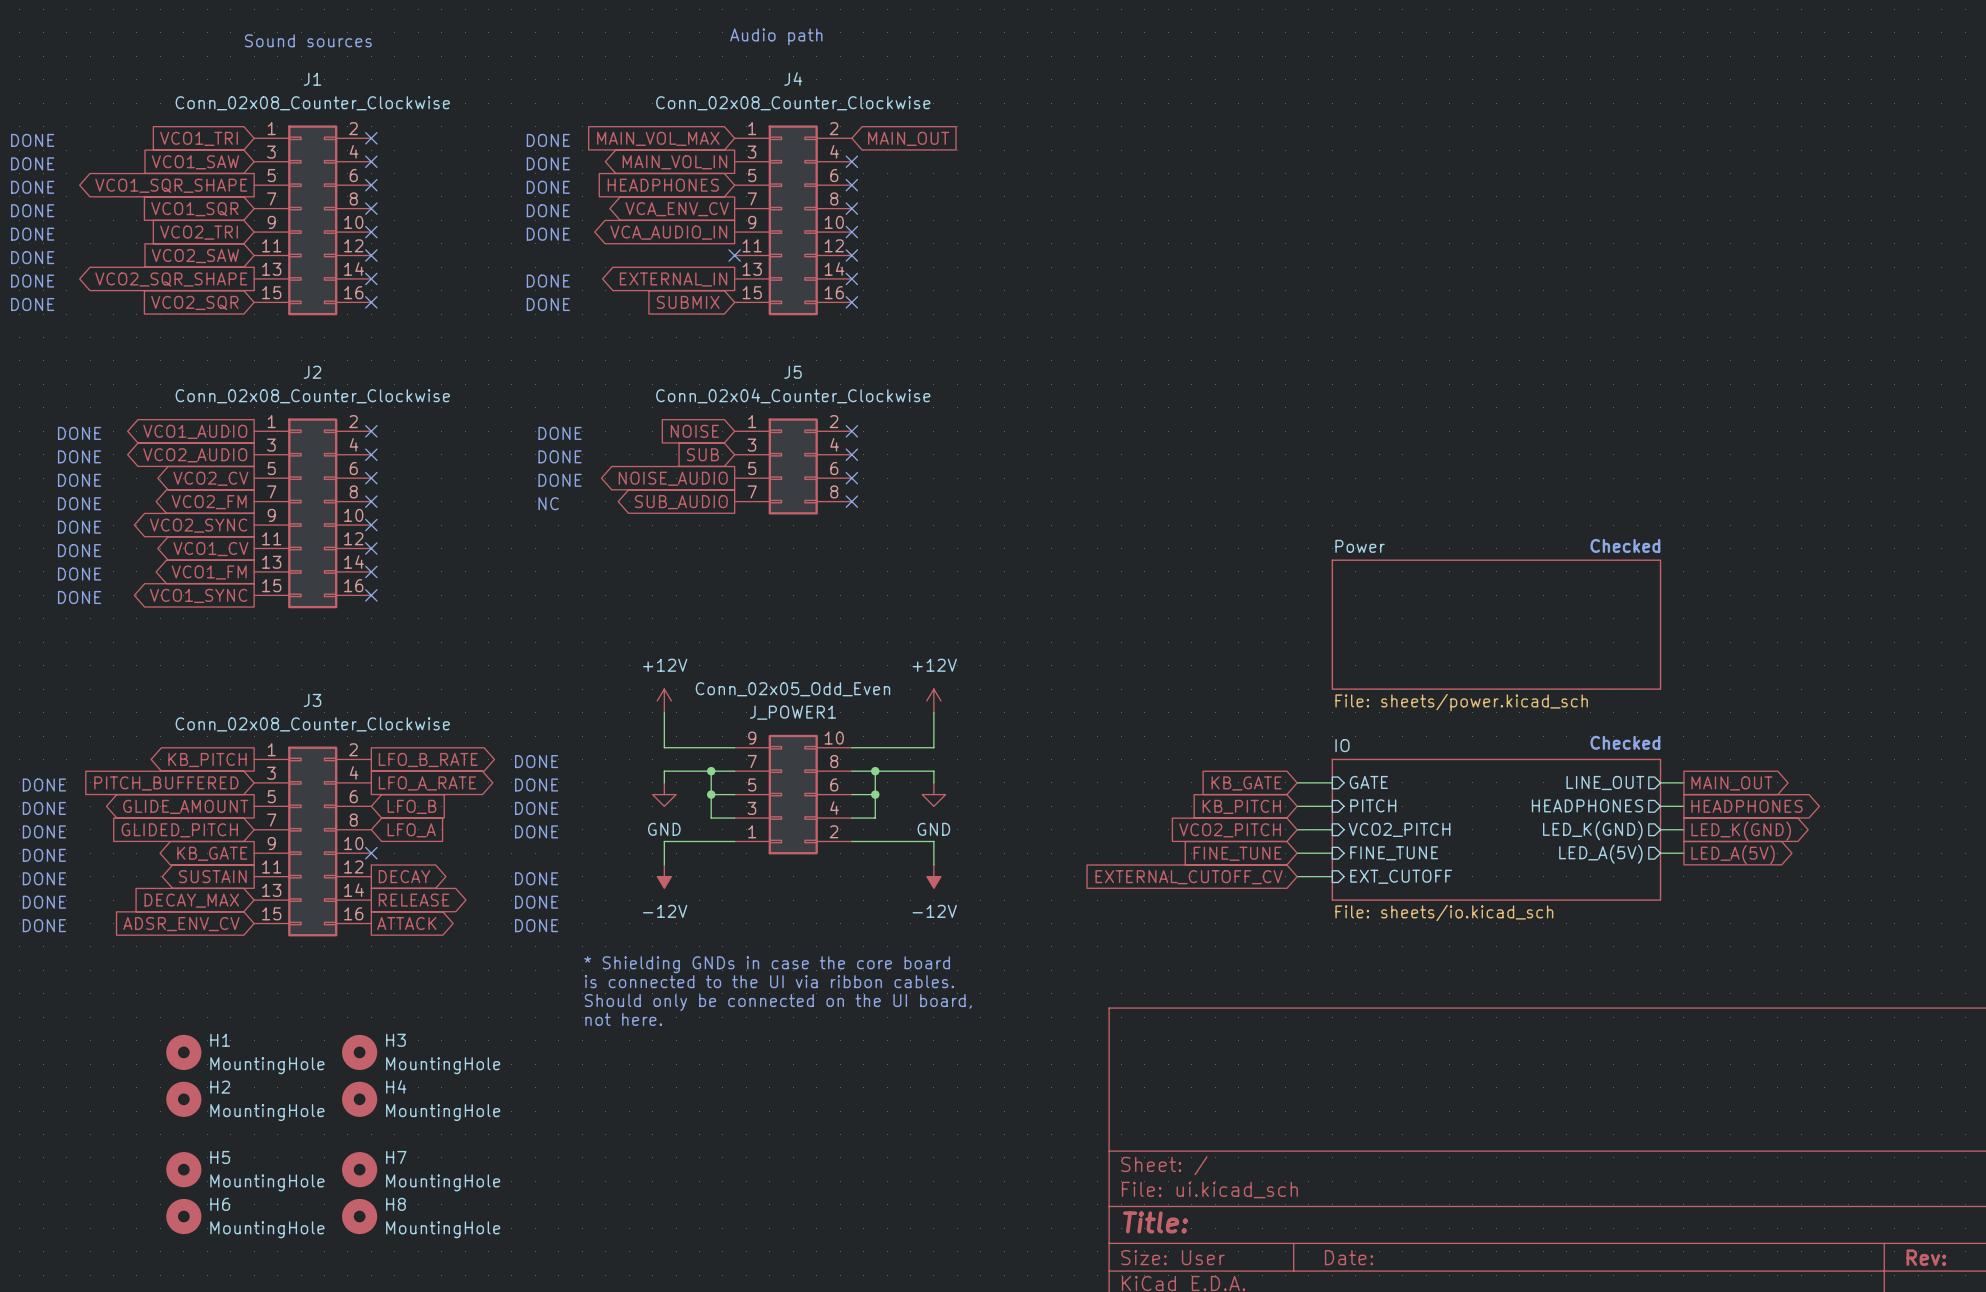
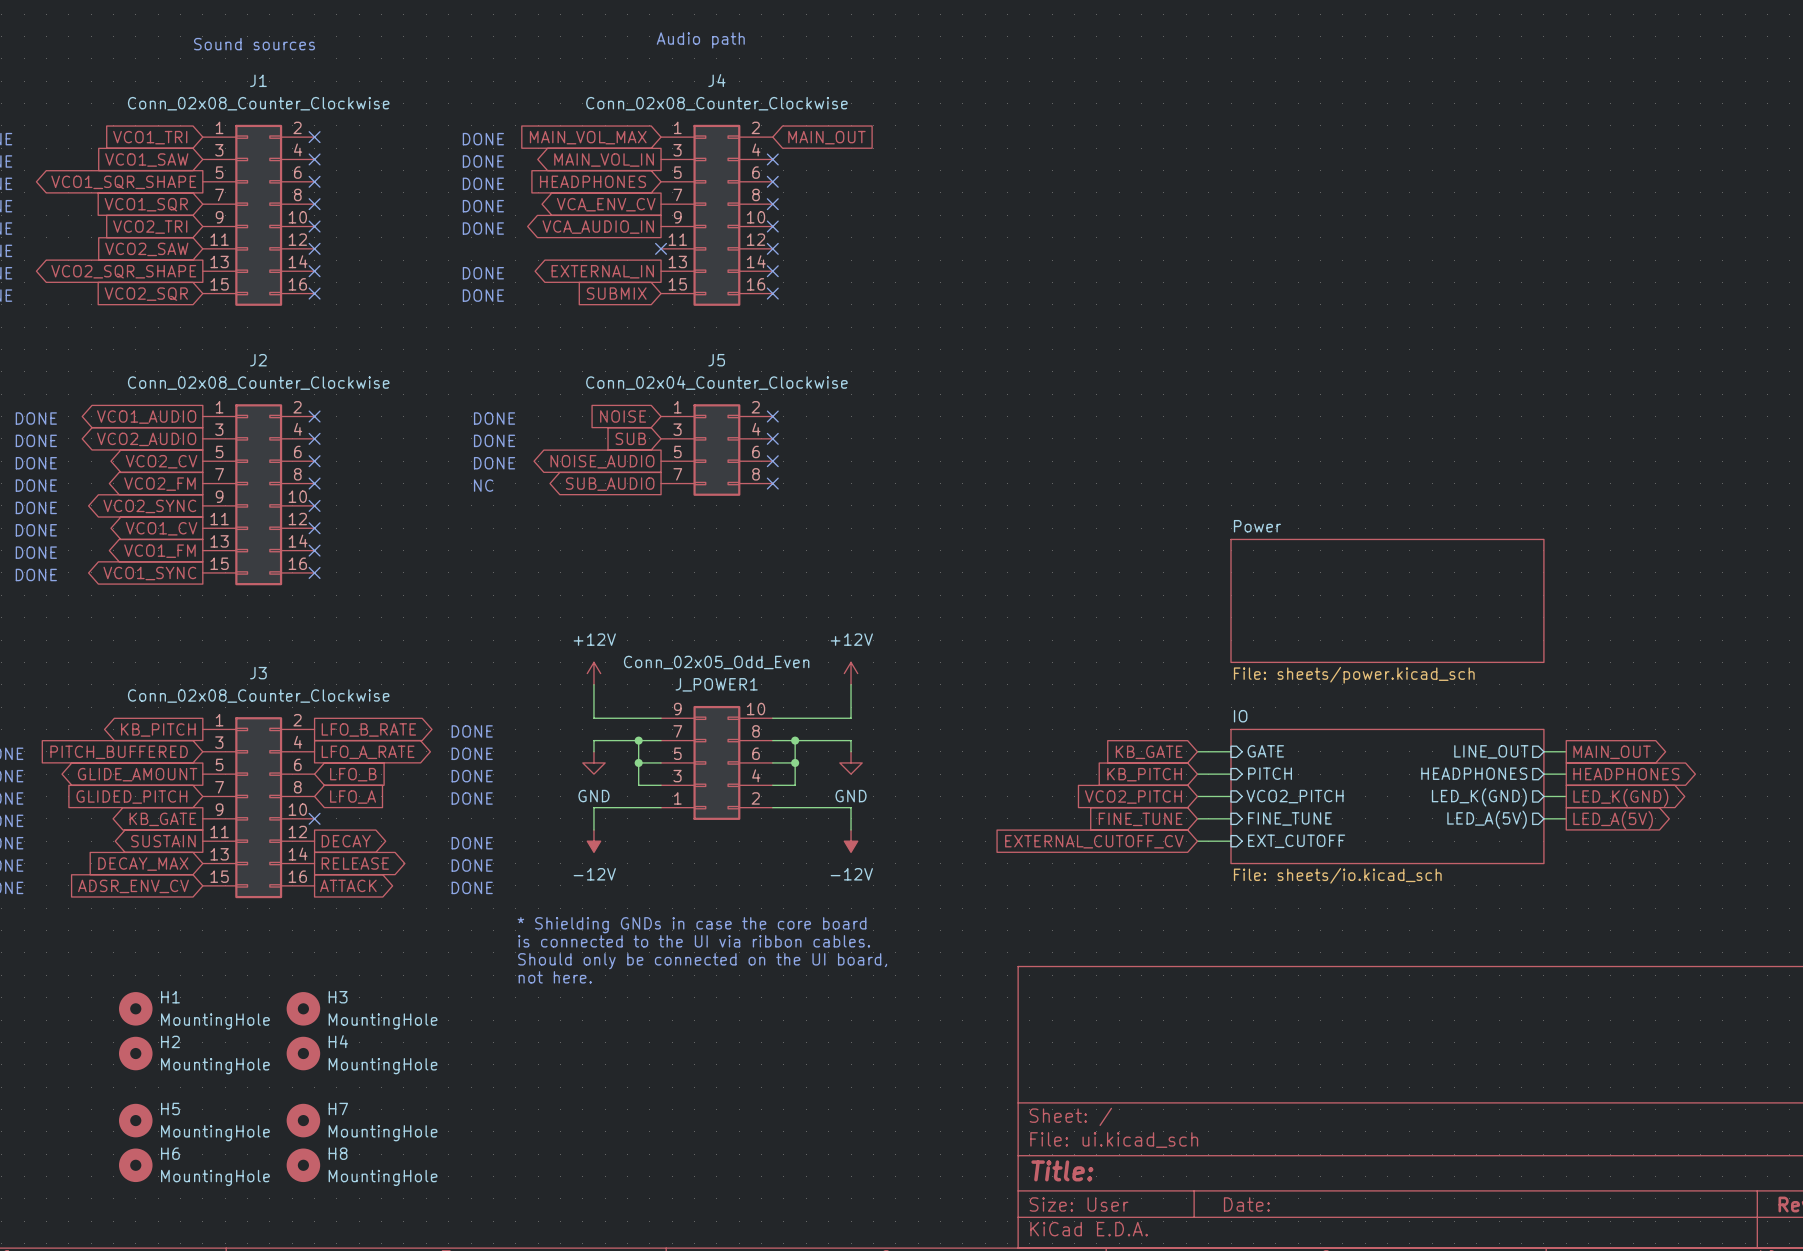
text: Checked (1625, 545) -> none
text: Checked (1625, 742) -> none

